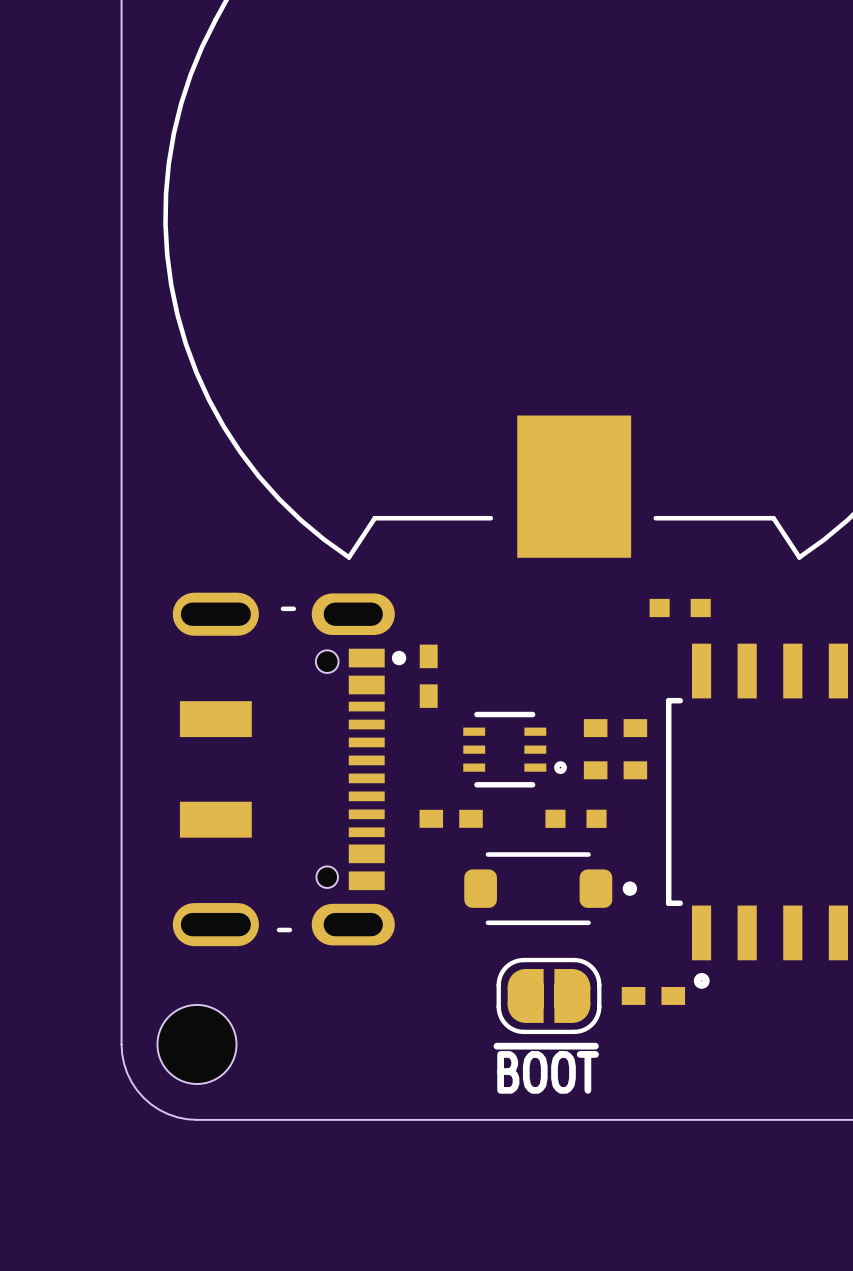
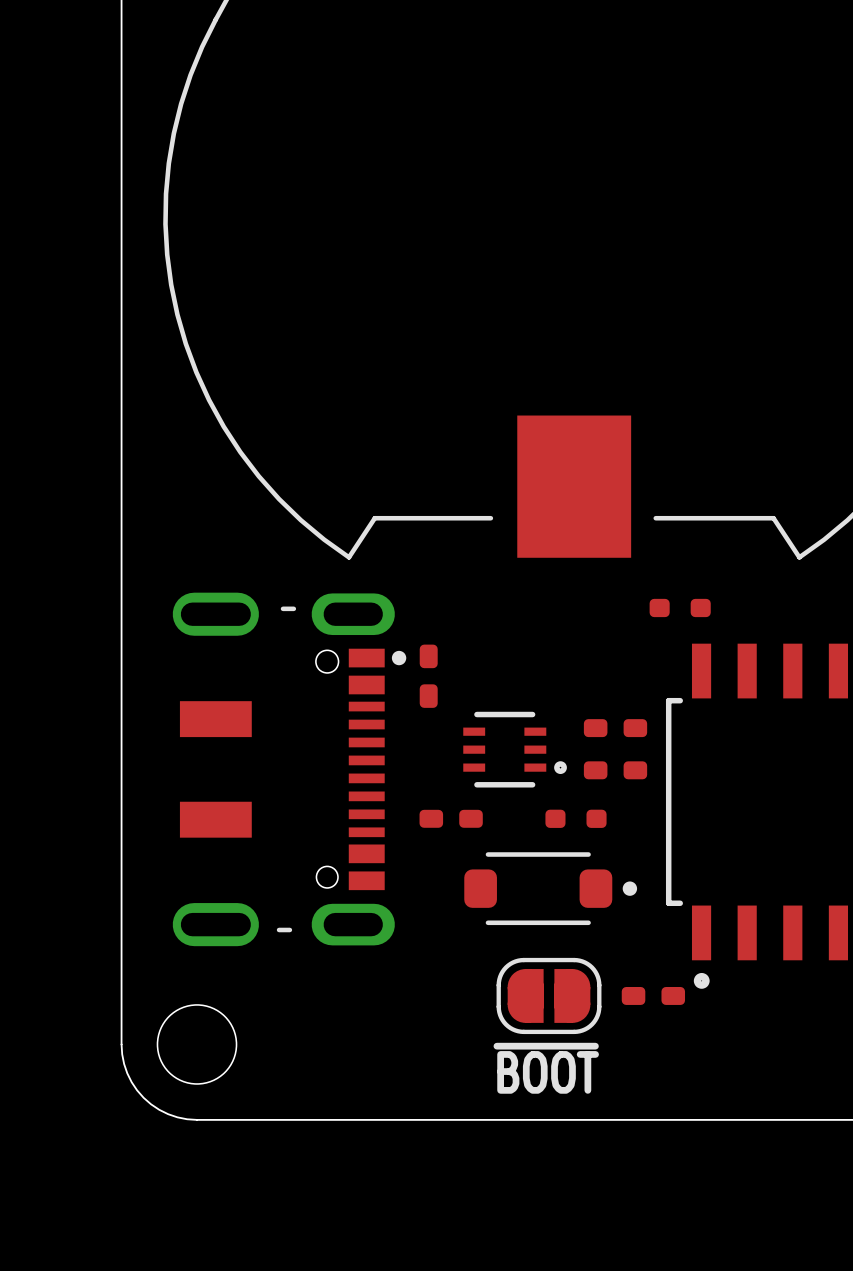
part footprint: [649, 598, 711, 618] -> [649, 598, 711, 618]
part footprint: [419, 644, 438, 708] -> [419, 644, 438, 708]
part footprint: [583, 719, 648, 738] -> [583, 719, 648, 738]
part footprint: [583, 761, 648, 780] -> [583, 761, 648, 780]
part footprint: [419, 809, 483, 828] -> [419, 809, 483, 828]
part footprint: [545, 809, 607, 828] -> [545, 809, 607, 828]
part footprint: [621, 986, 686, 1005] -> [621, 986, 686, 1005]

